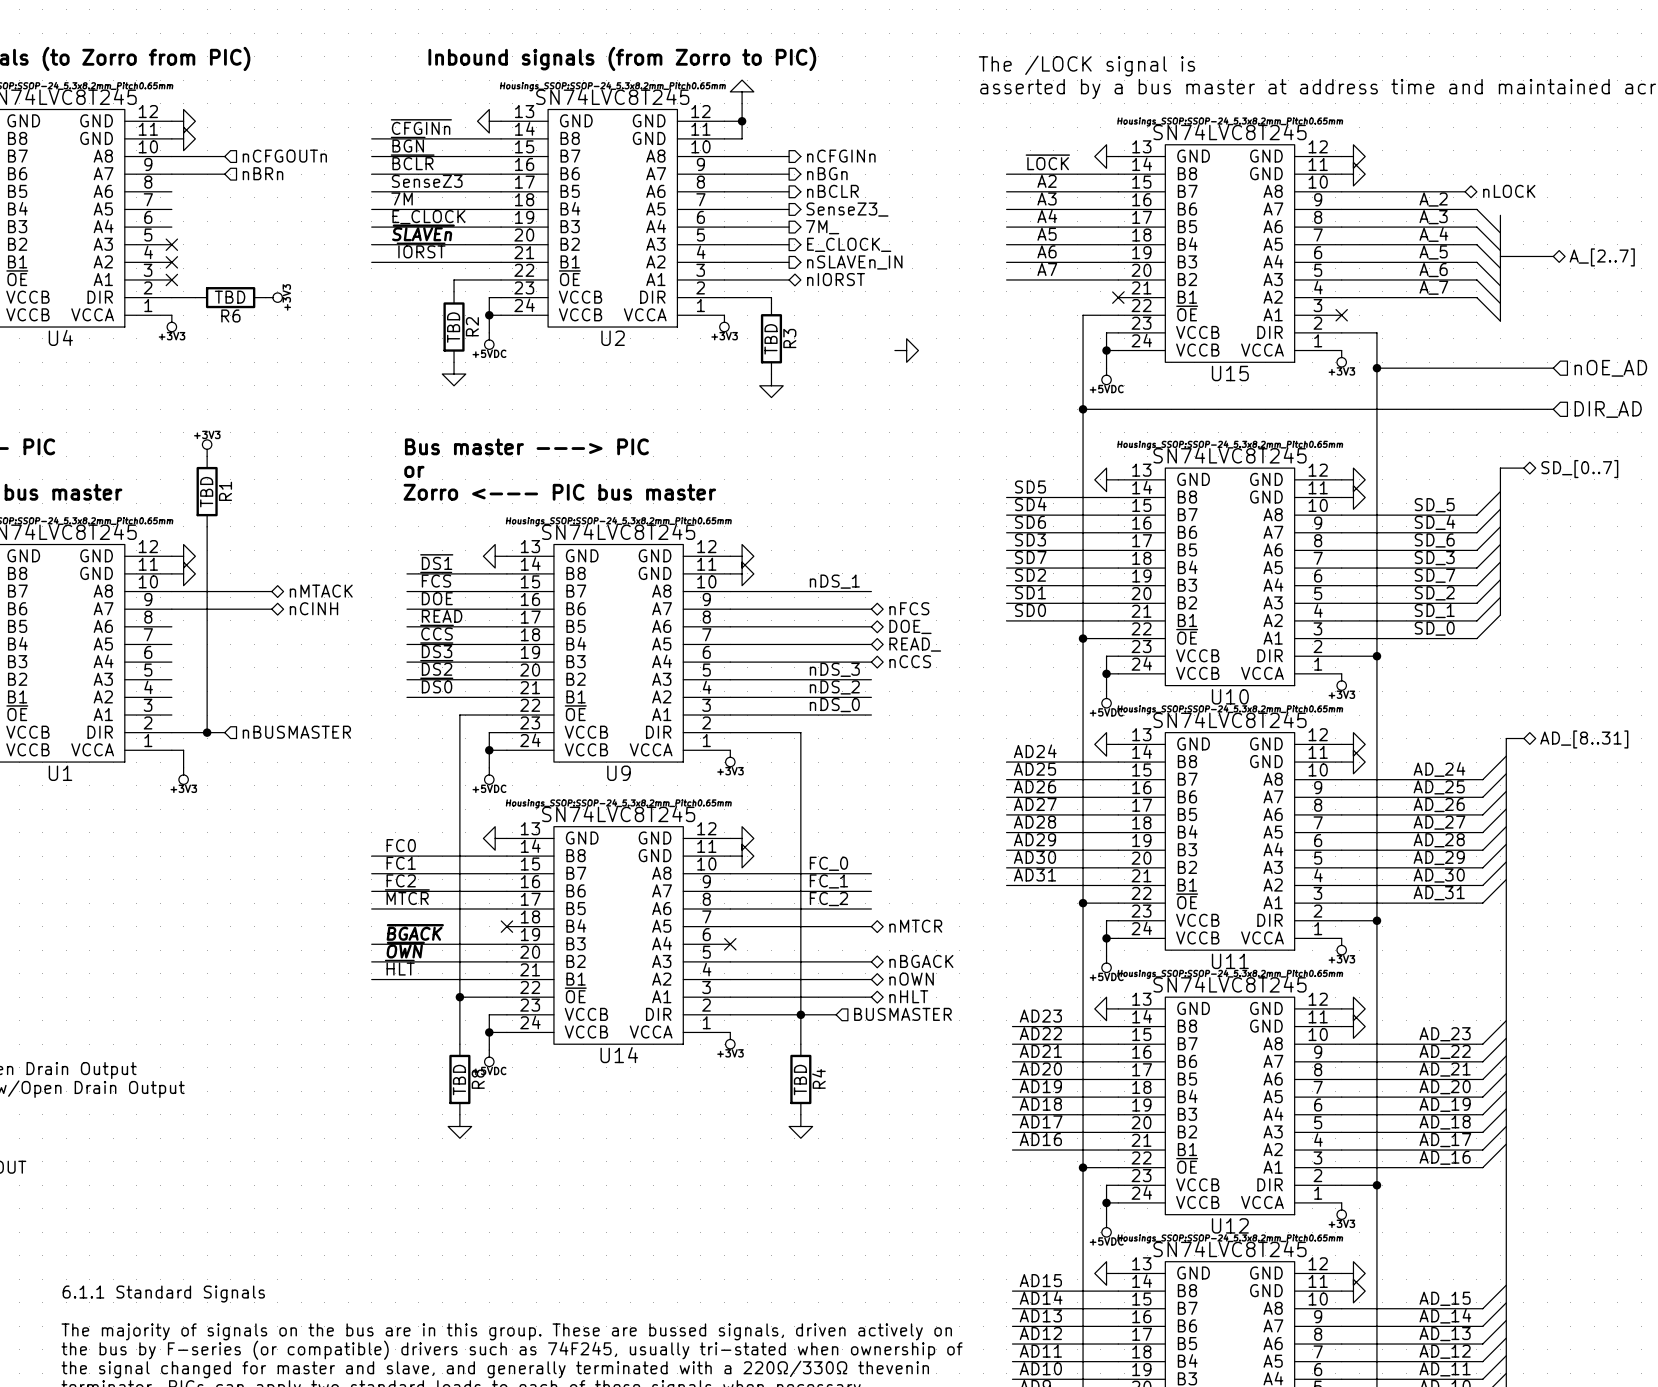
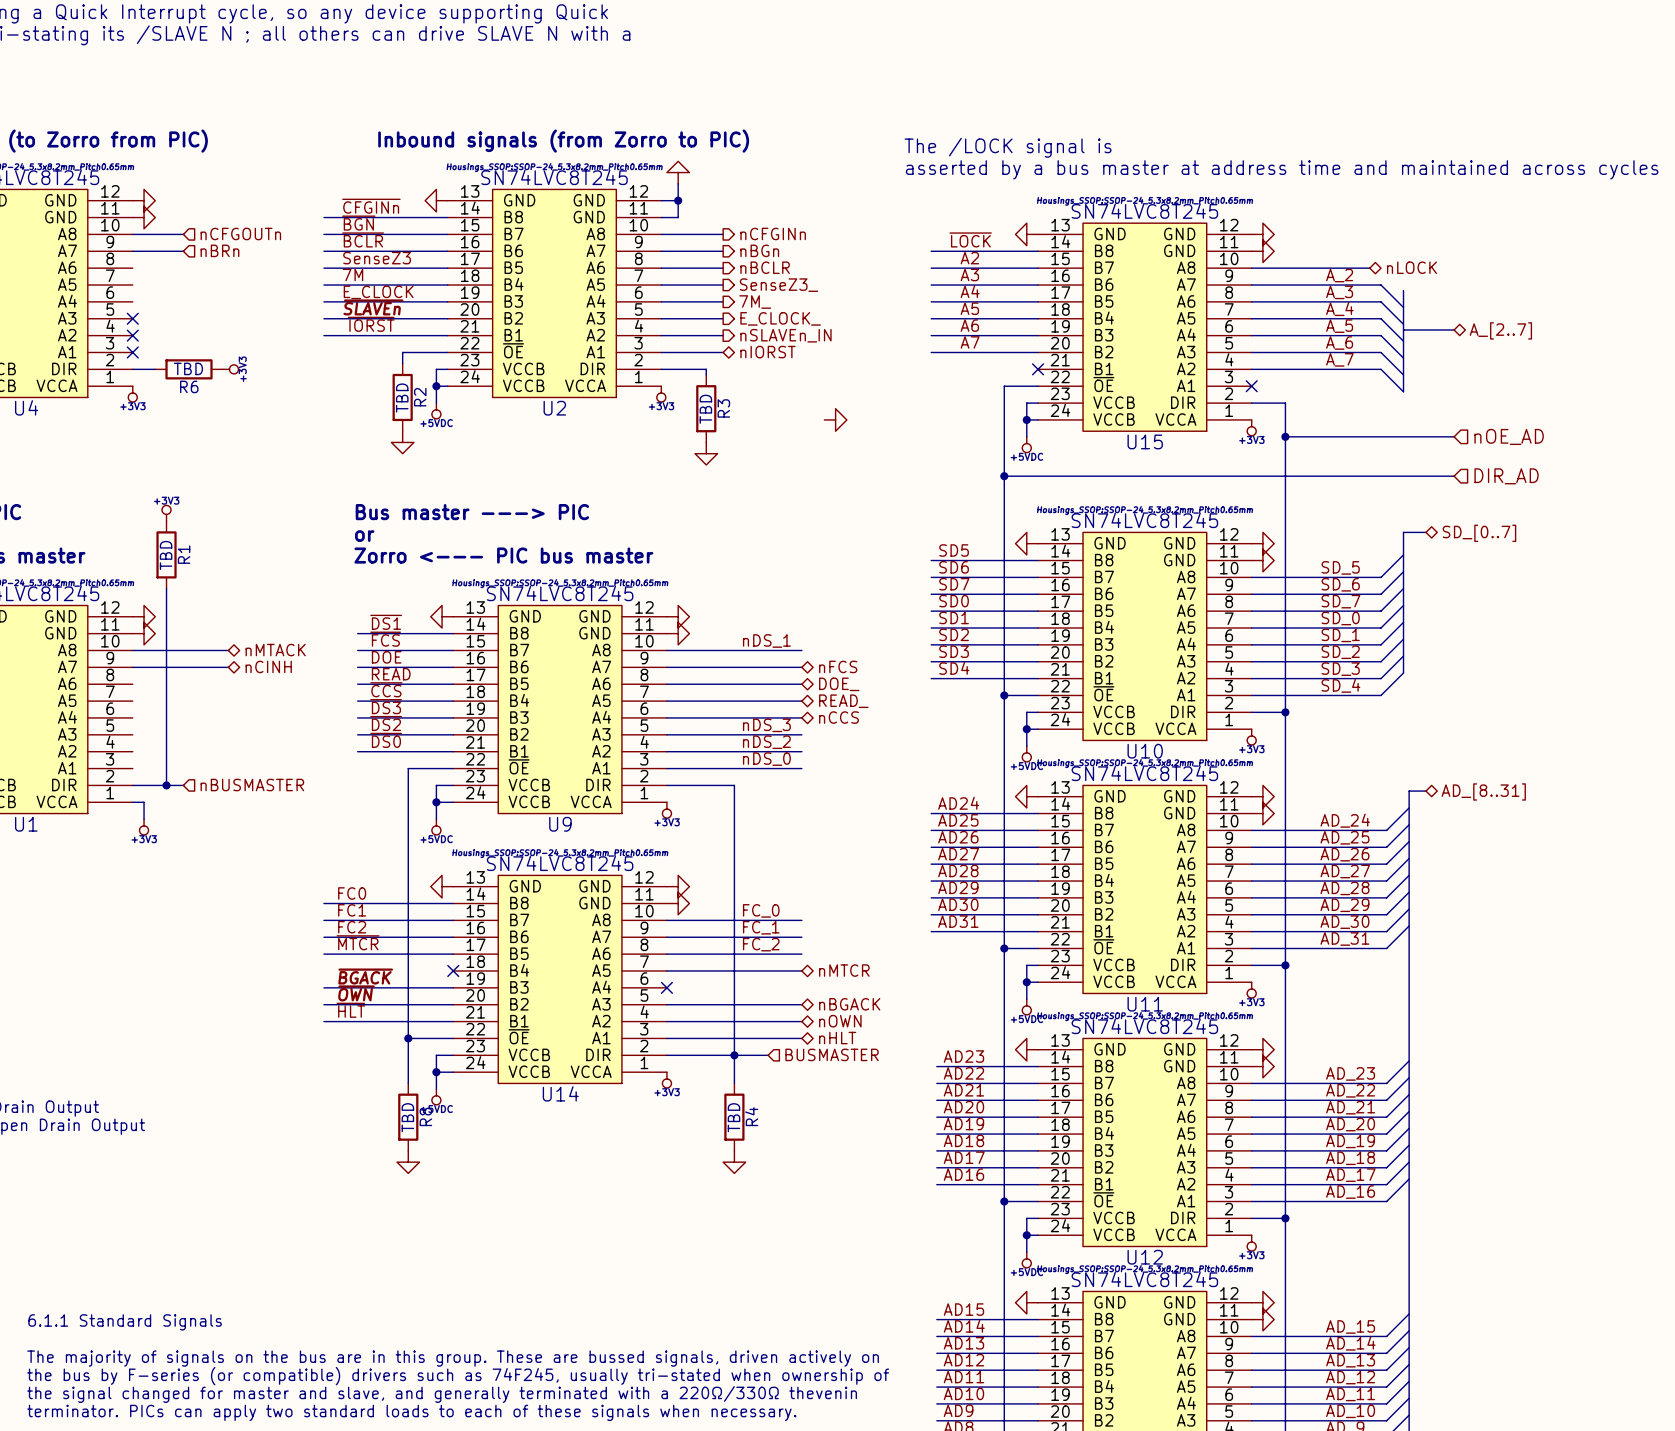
label: SD4 (1030, 504) -> SD6 (954, 567)
label: SD6 (1030, 522) -> SD7 (954, 584)
label: SD_4 (1434, 522) -> SD_6 (1340, 584)
label: SD3 (1030, 539) -> SD0 (954, 601)
label: SD_6 (1434, 540) -> SD_7 (1340, 601)
label: SD7 (1030, 557) -> SD1 (954, 617)
label: SD_3 (1434, 558) -> SD_0 (1340, 618)
label: SD_7 (1434, 575) -> SD_1 (1340, 635)
label: SD1 (1030, 592) -> SD3 (954, 651)
label: SD0 (1030, 610) -> SD4 (954, 668)
label: SD_1 (1434, 611) -> SD_3 (1340, 669)
label: SD_0 (1434, 628) -> SD_4 (1340, 685)

